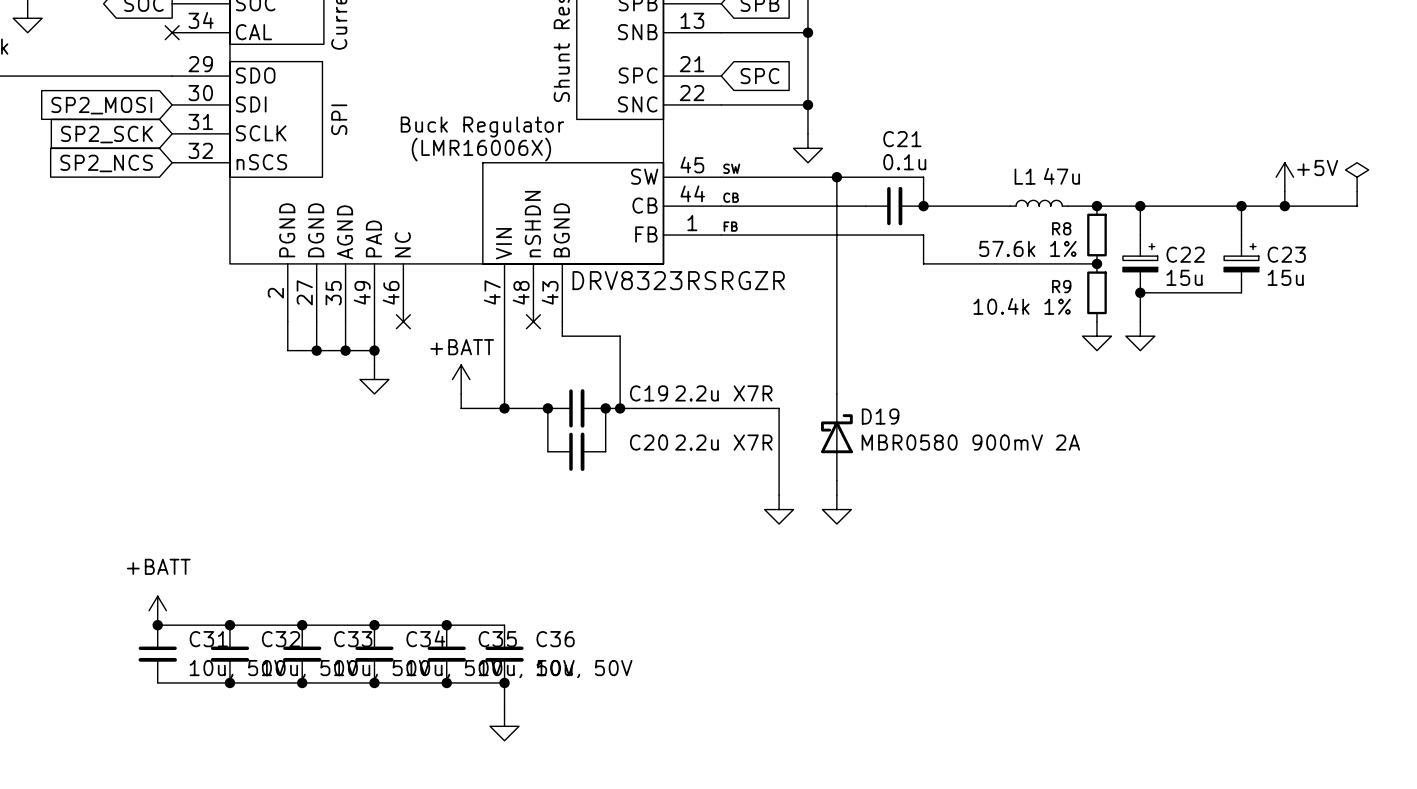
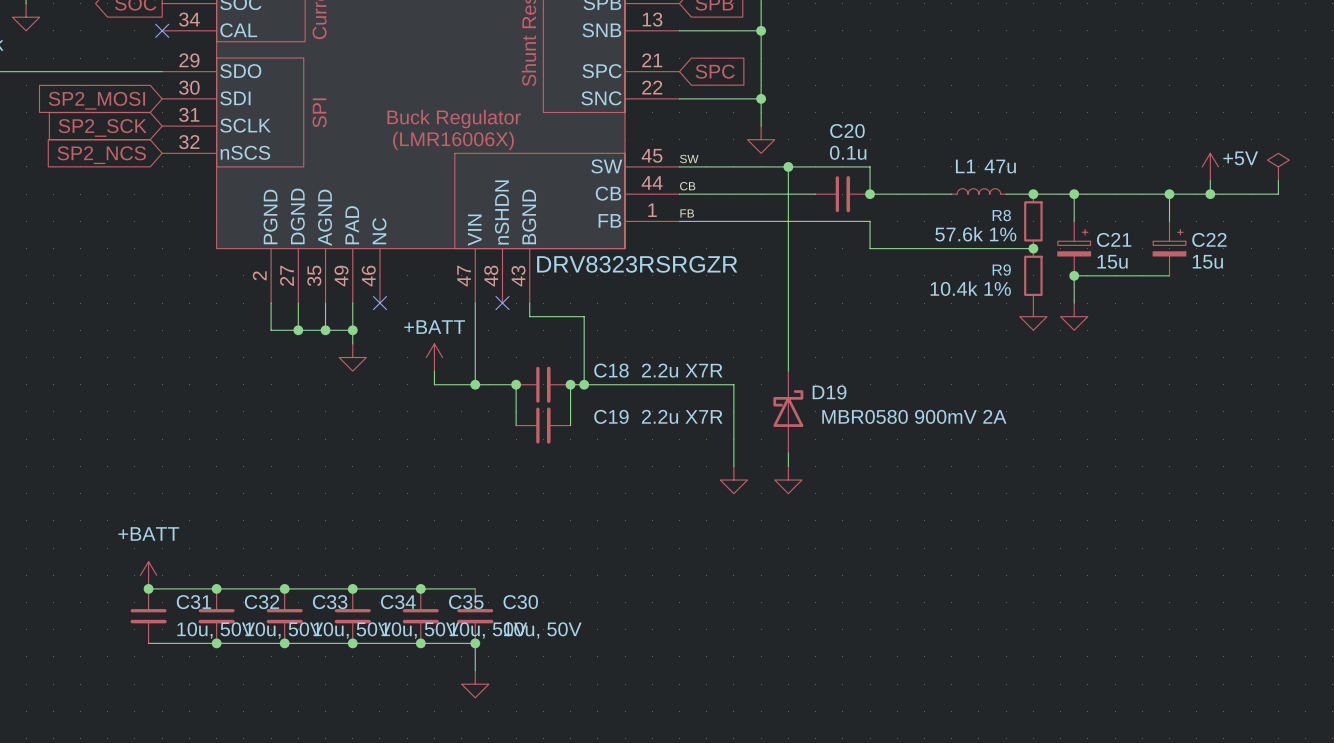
C21 name: C21 (902, 139) -> C20 (847, 131)
C22 name: C22 (1185, 254) -> C21 (1114, 239)
C23 name: C23 (1286, 254) -> C22 (1209, 239)
C19 name: C19 (649, 393) -> C18 (611, 370)
C20 name: C20 (649, 442) -> C19 (611, 416)
C36 name: C36 (555, 639) -> C30 (520, 602)

